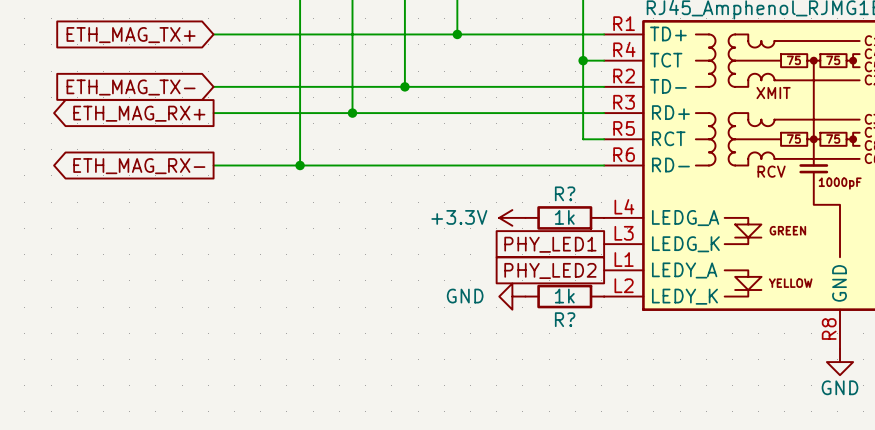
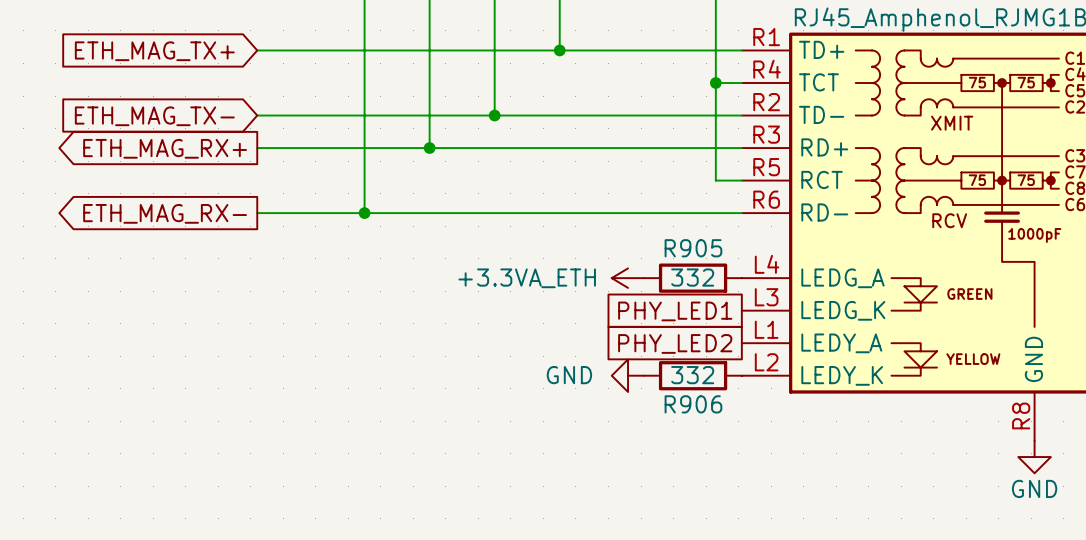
R? name: R? (565, 193) -> R905 (693, 248)
power symbol: +3.3V (512, 217) -> +3.3VA_ETH (628, 278)
R? value: 1k (564, 217) -> 332 (692, 277)
R? value: 1k (564, 296) -> 332 (692, 375)
R? name: R? (565, 319) -> R906 (693, 404)

